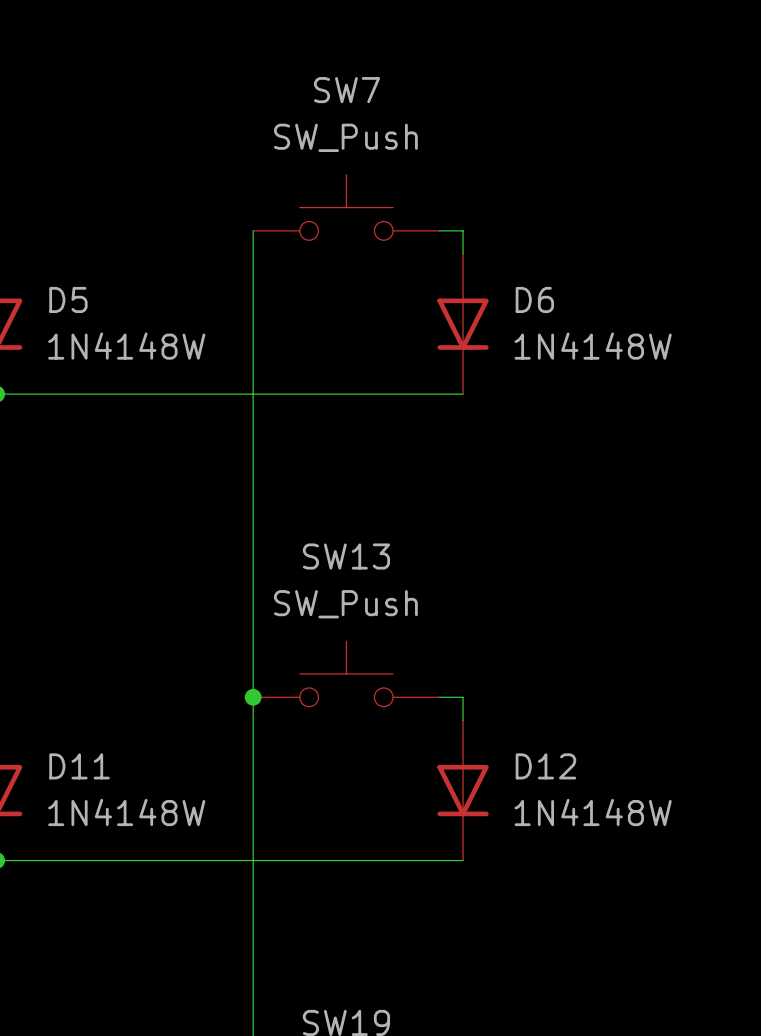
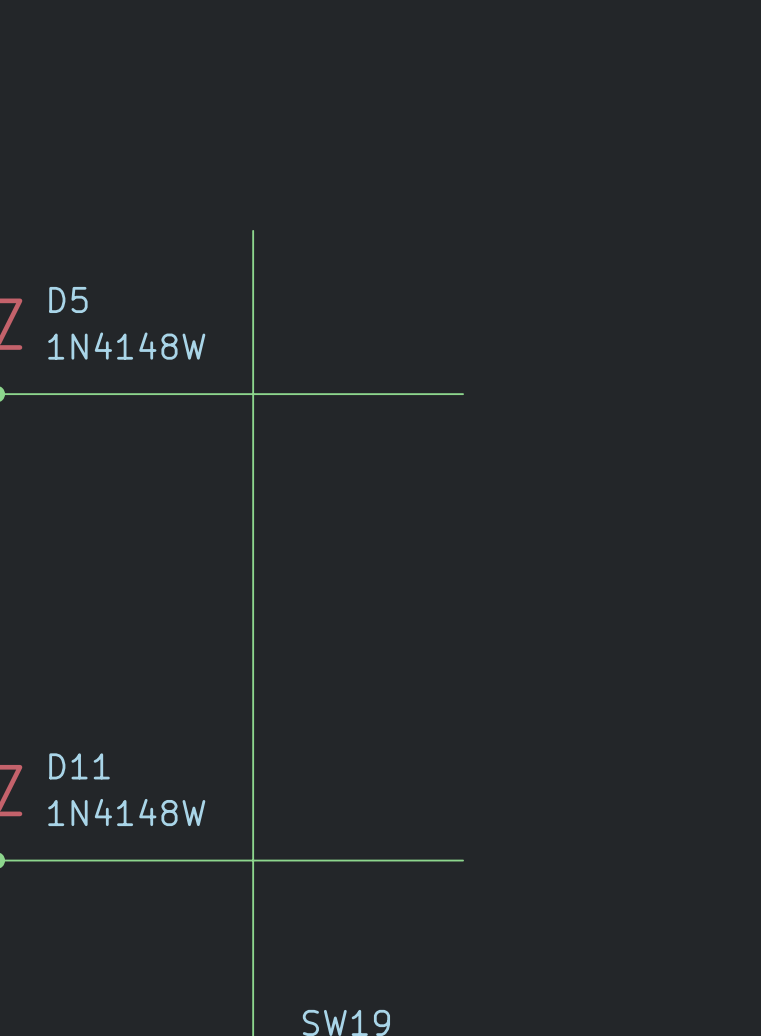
SW7: SW_Push (346, 207) -> none
wire: (439, 230) (463, 230) (463, 254) -> none
D6: 1N4148W (463, 324) -> none
SW13: SW_Push (346, 673) -> none
junction: (253, 697) -> none
wire: (439, 697) (463, 697) (463, 720) -> none
D12: 1N4148W (463, 790) -> none

